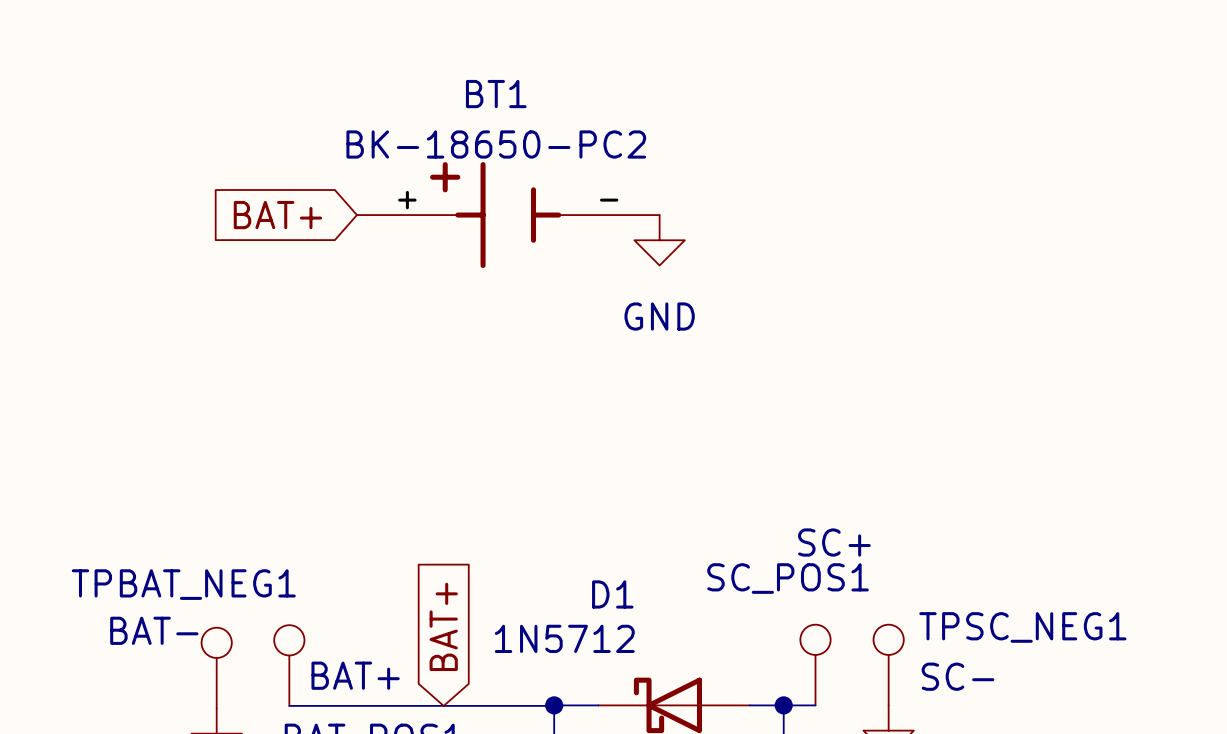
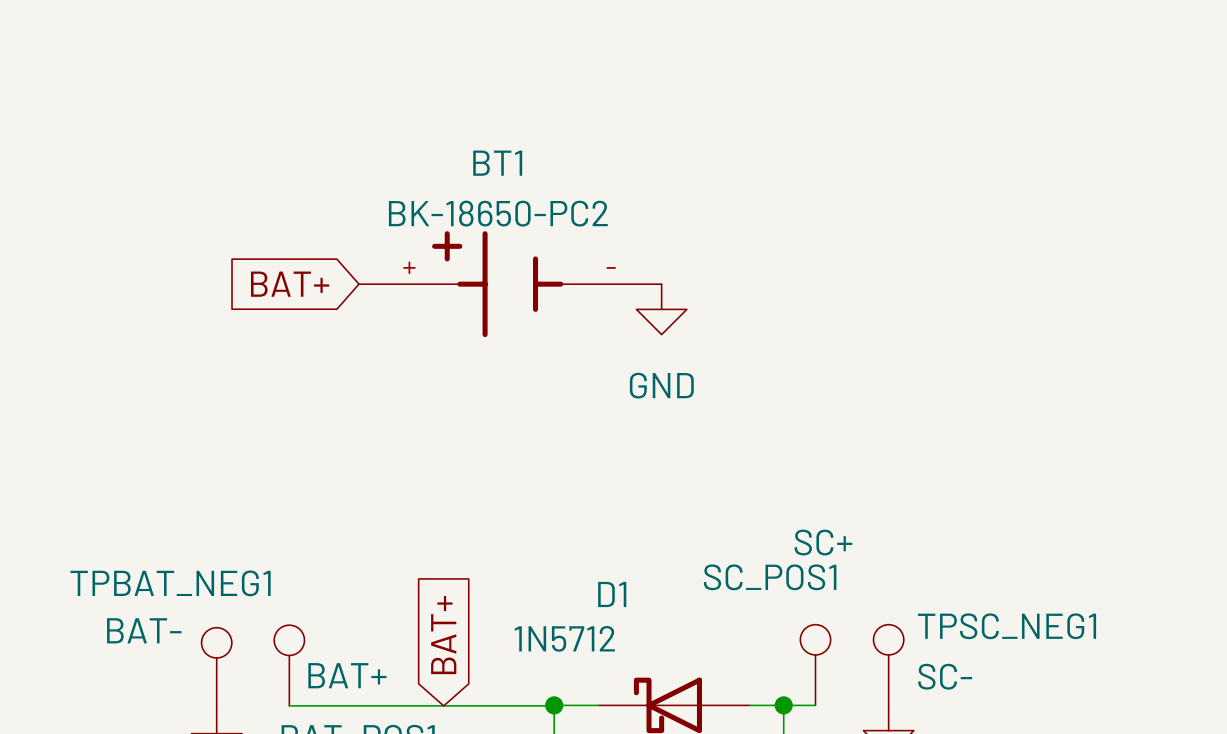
global label position: BAT+ (277, 215) -> BAT+ (290, 284)
BT1 position: (508, 215) -> (510, 284)
power symbol position: GND (659, 240) -> GND (661, 309)

